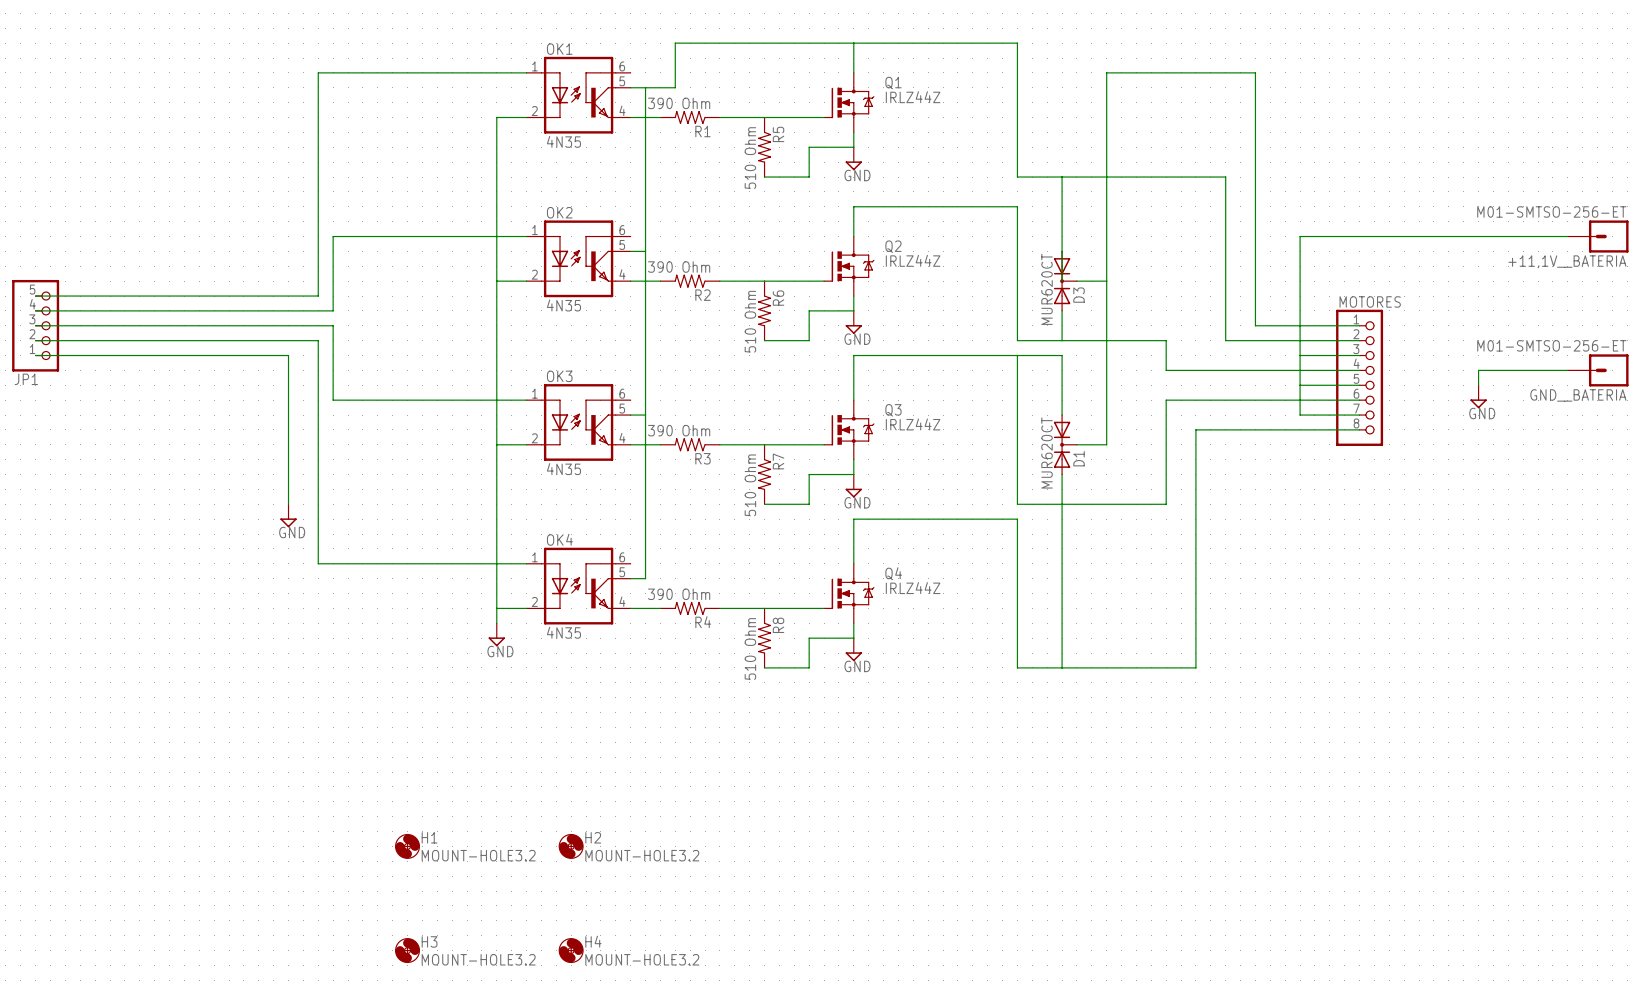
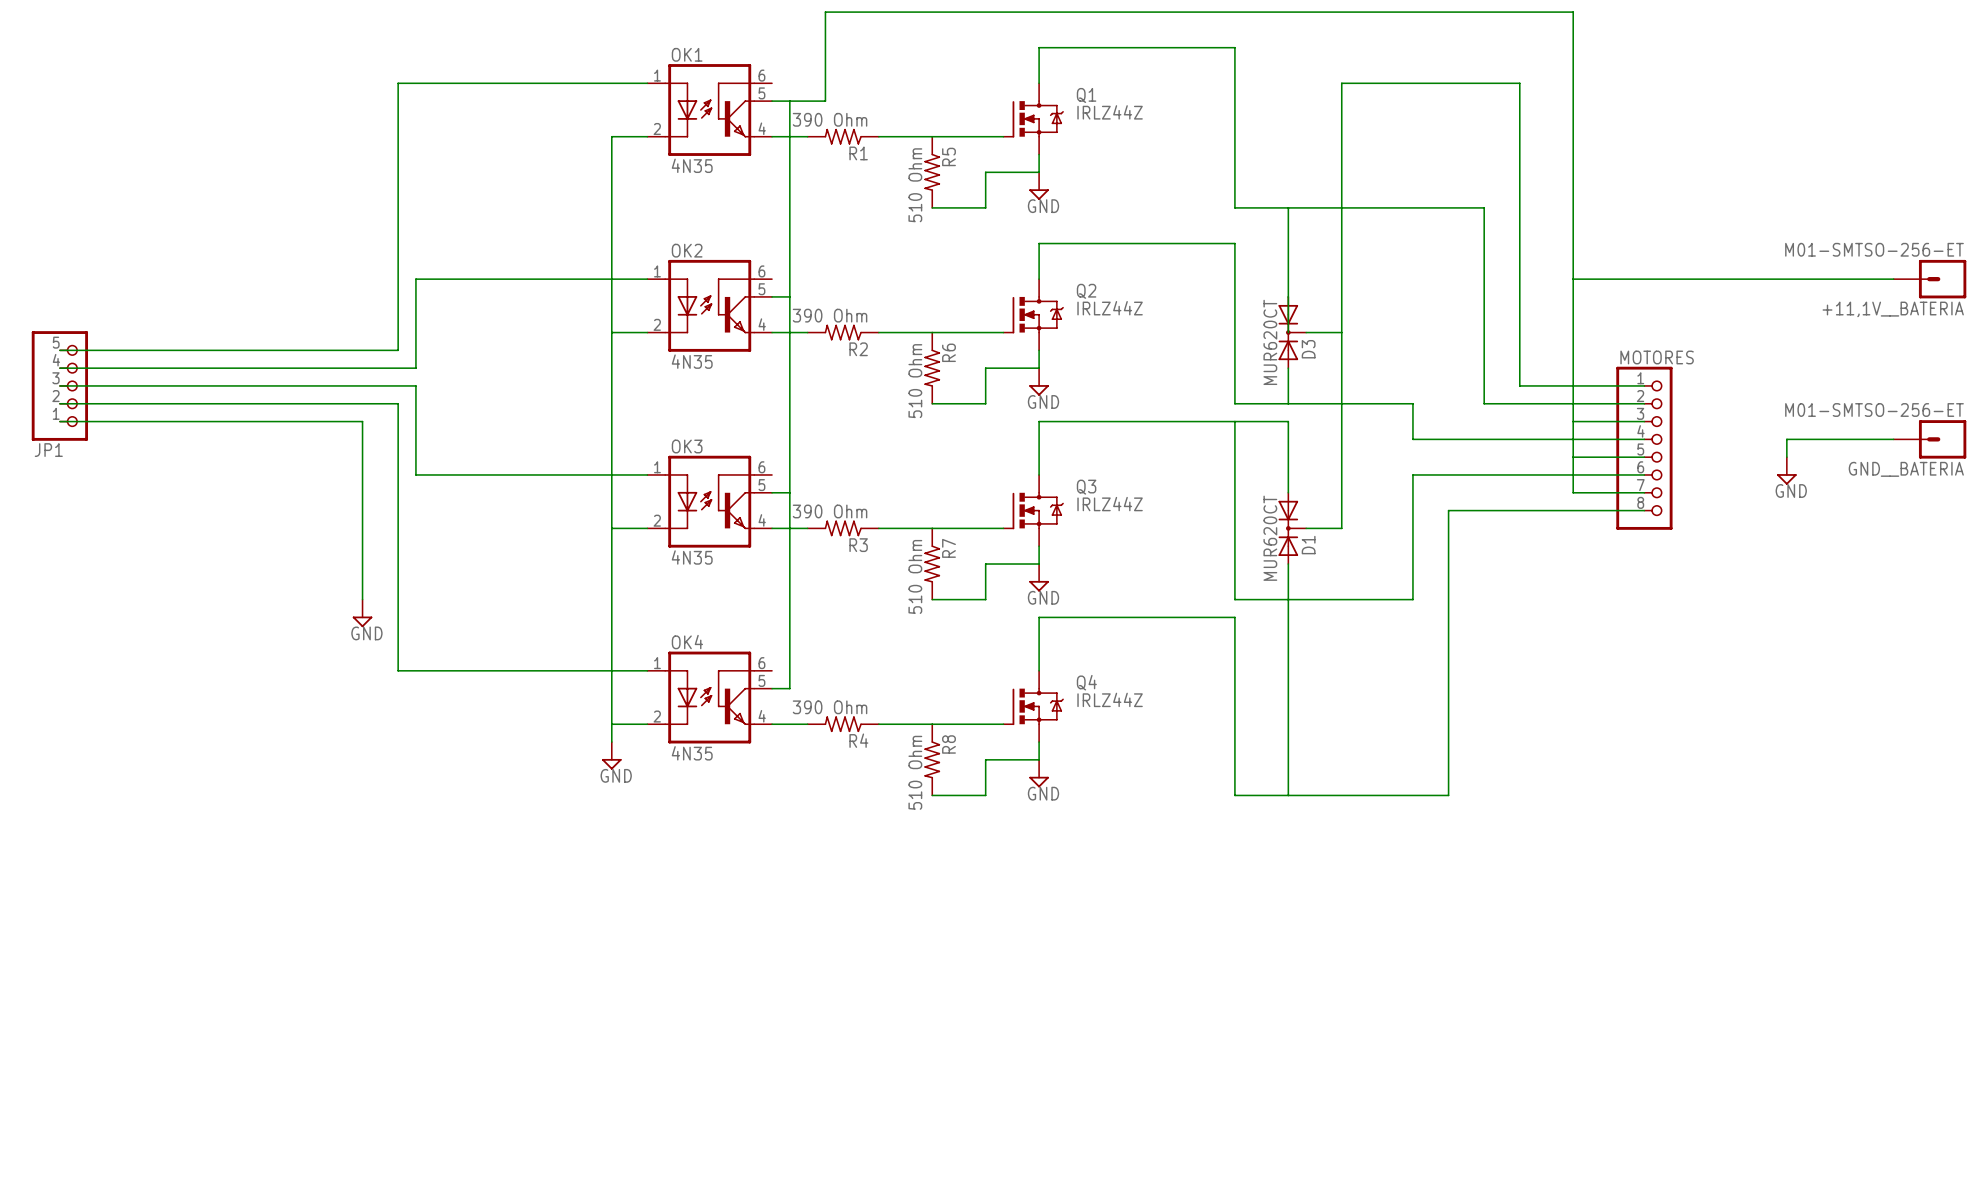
wire: (675, 43) (853, 43) -> (825, 47) (825, 12) (1573, 12) (1573, 279)
H1: MOUNT-HOLE3.2 (407, 846) -> none
H2: MOUNT-HOLE3.2 (571, 846) -> none
H3: MOUNT-HOLE3.2 (407, 950) -> none
H4: MOUNT-HOLE3.2 (571, 950) -> none

